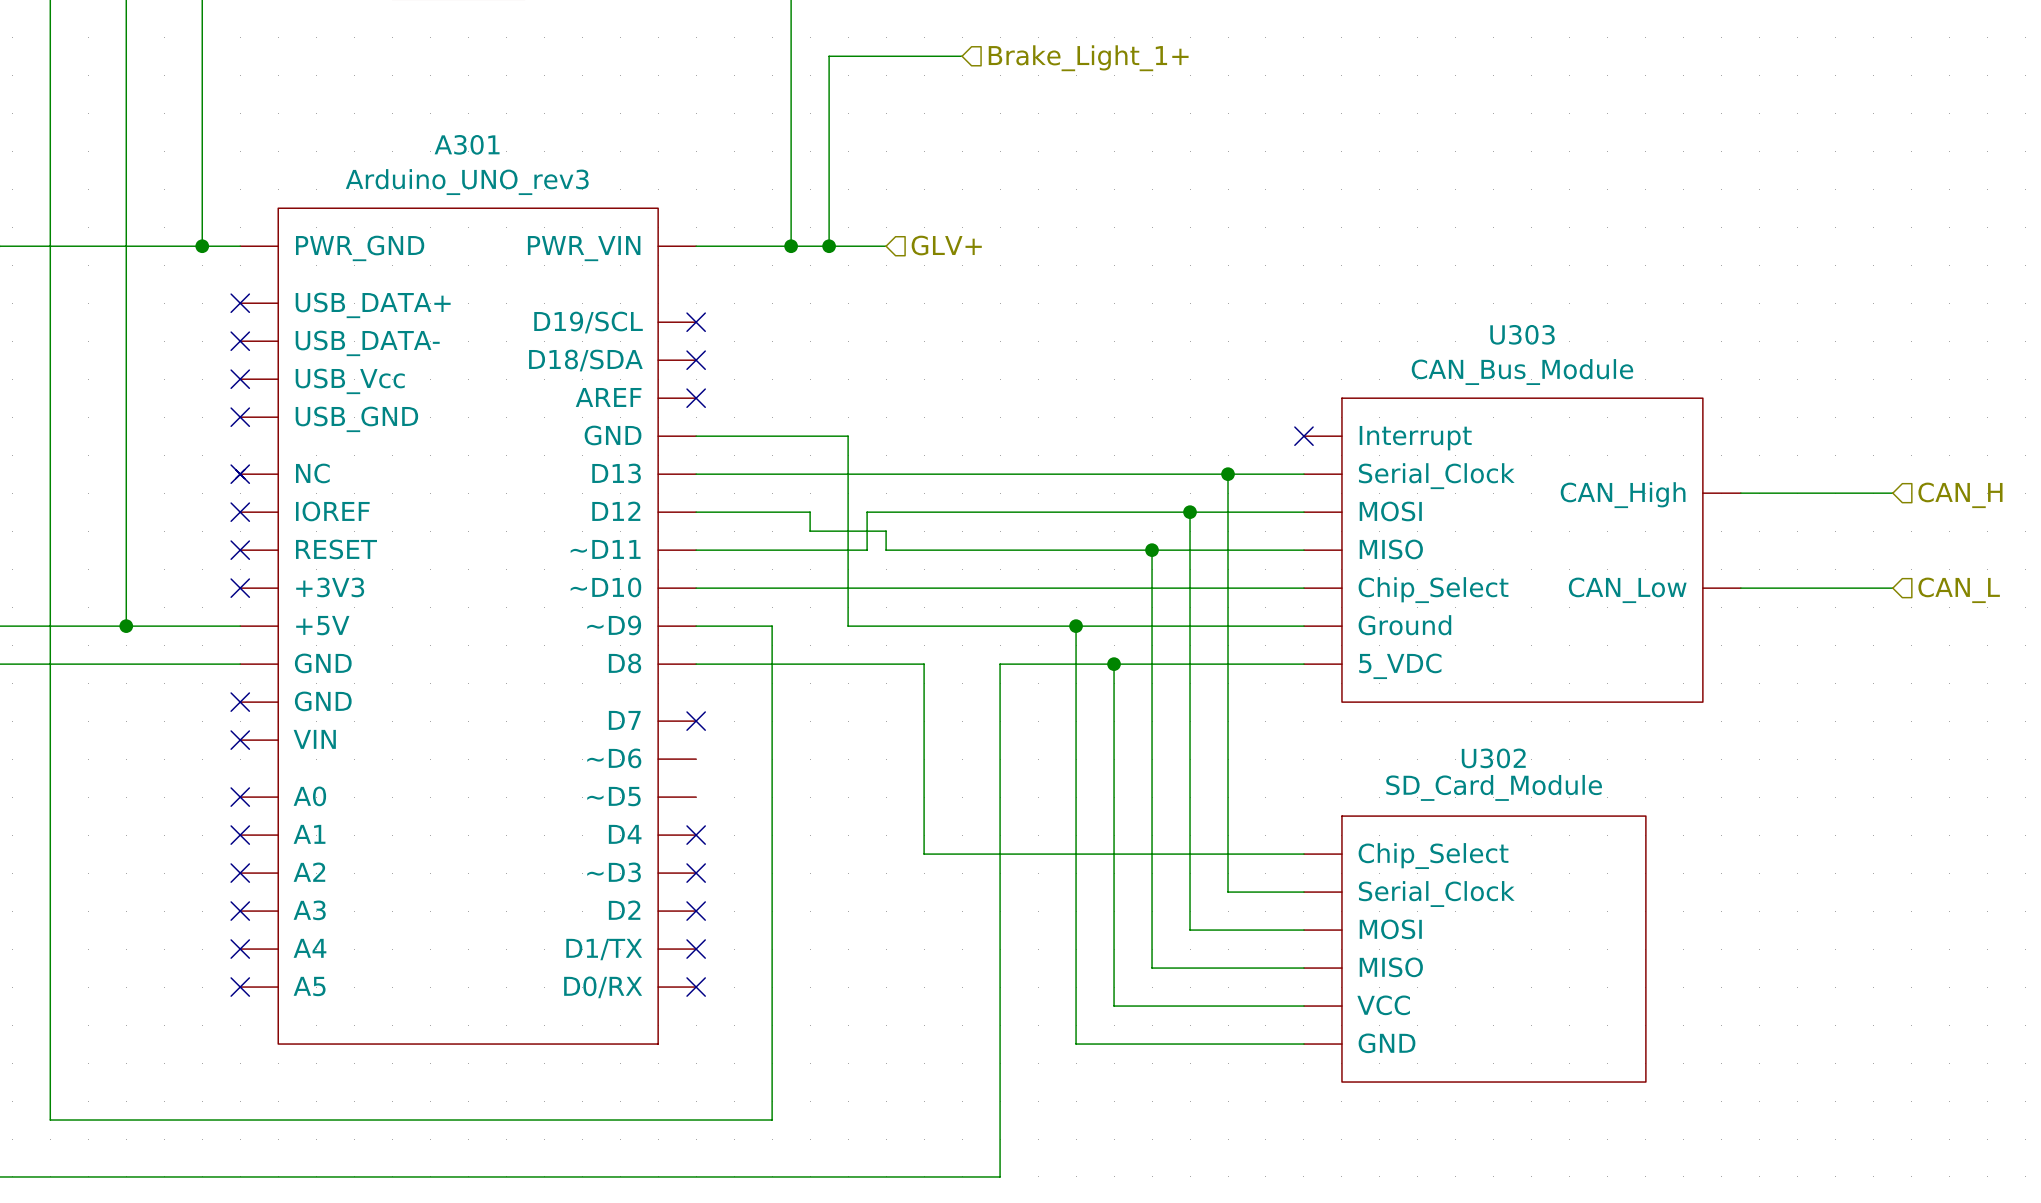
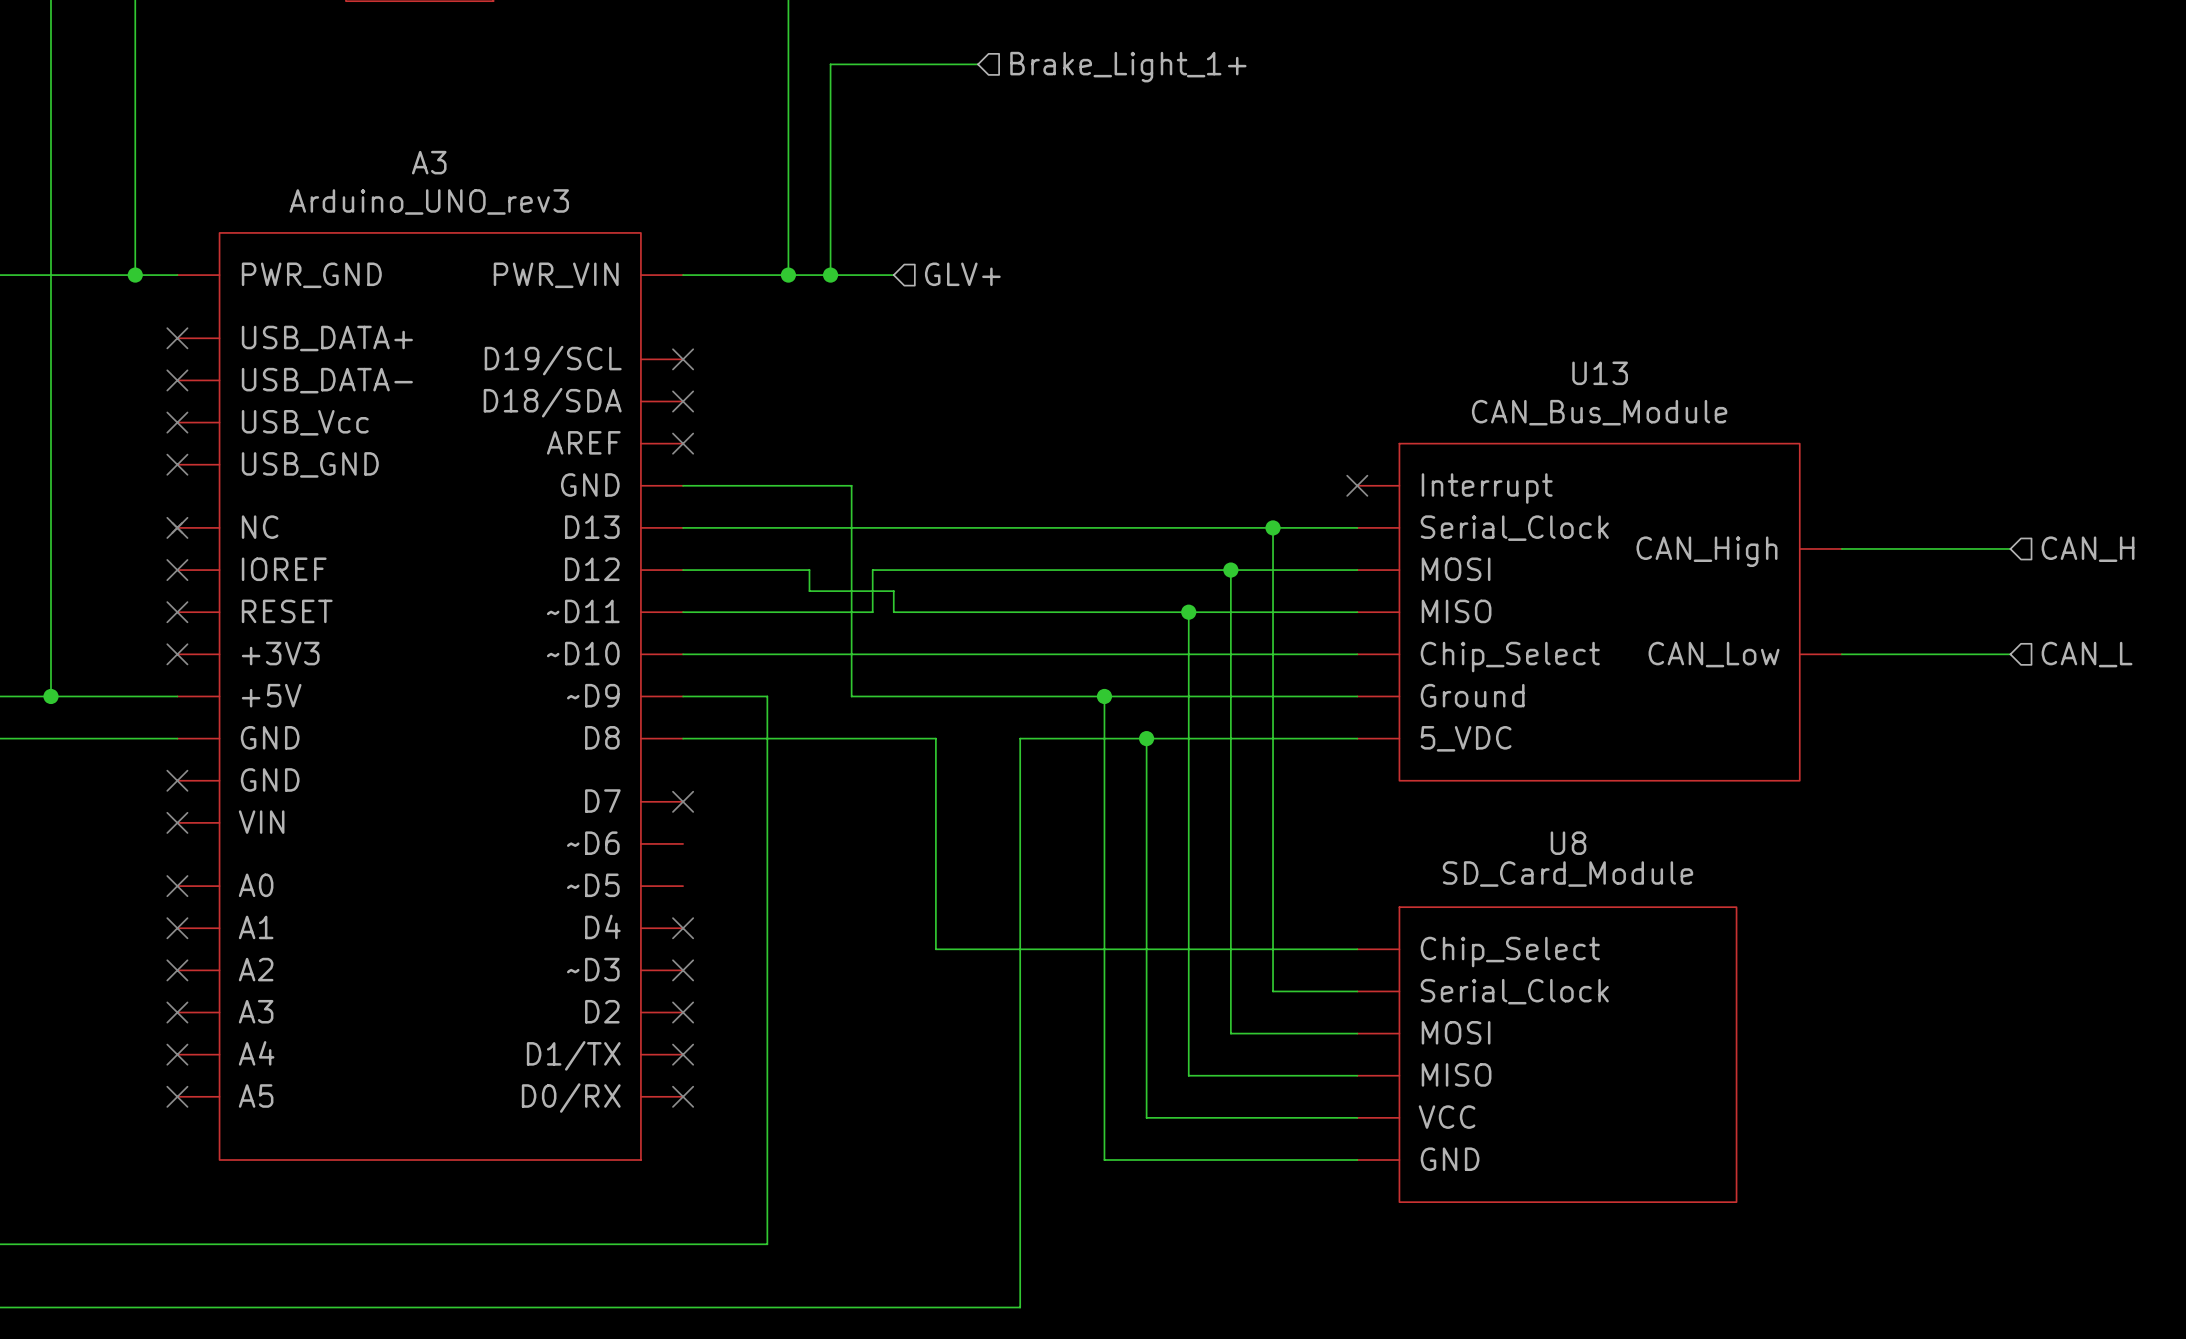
A301 name: A301 (467, 144) -> A3 (429, 162)
U303 name: U303 (1522, 334) -> U13 (1600, 373)
U302 name: U302 (1493, 758) -> U8 (1568, 843)

